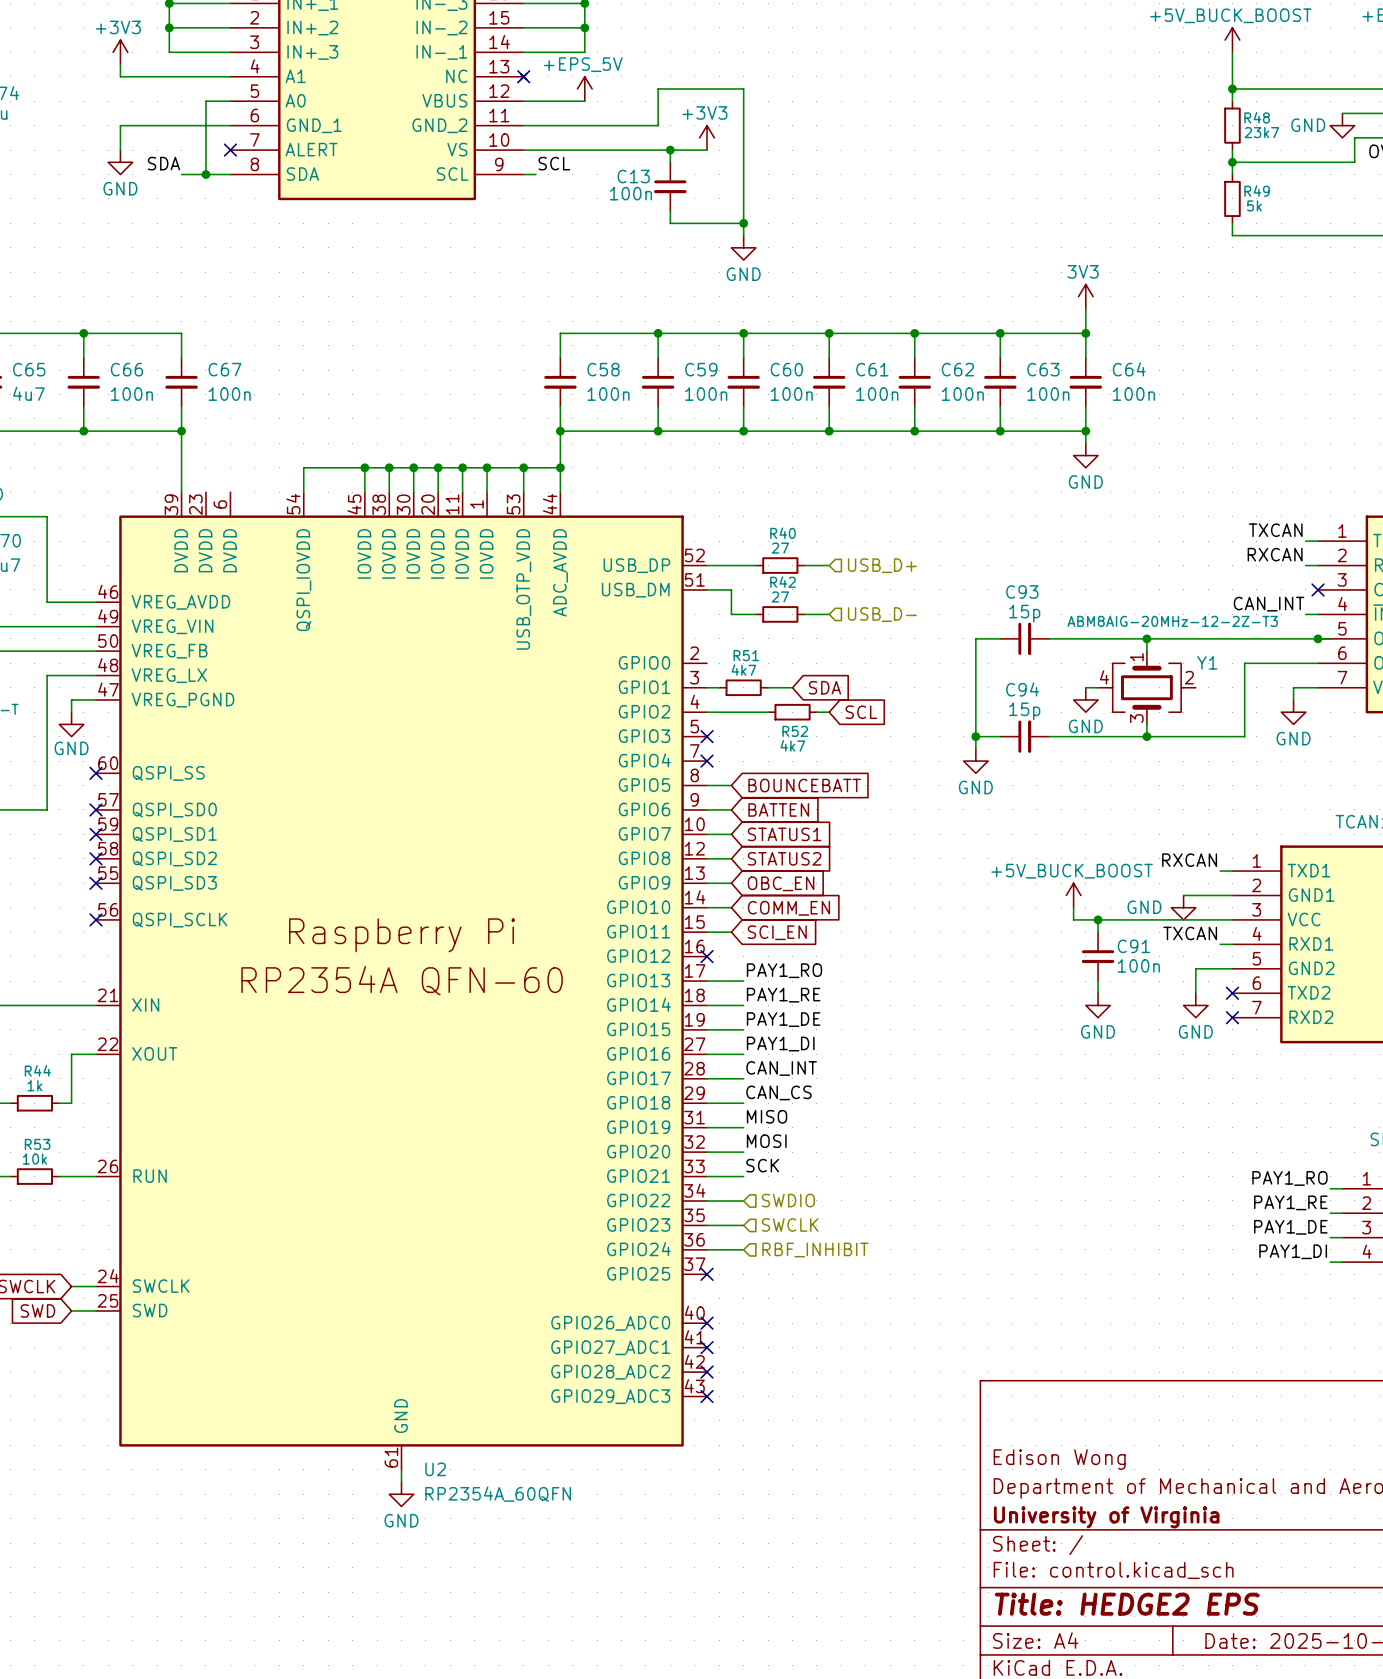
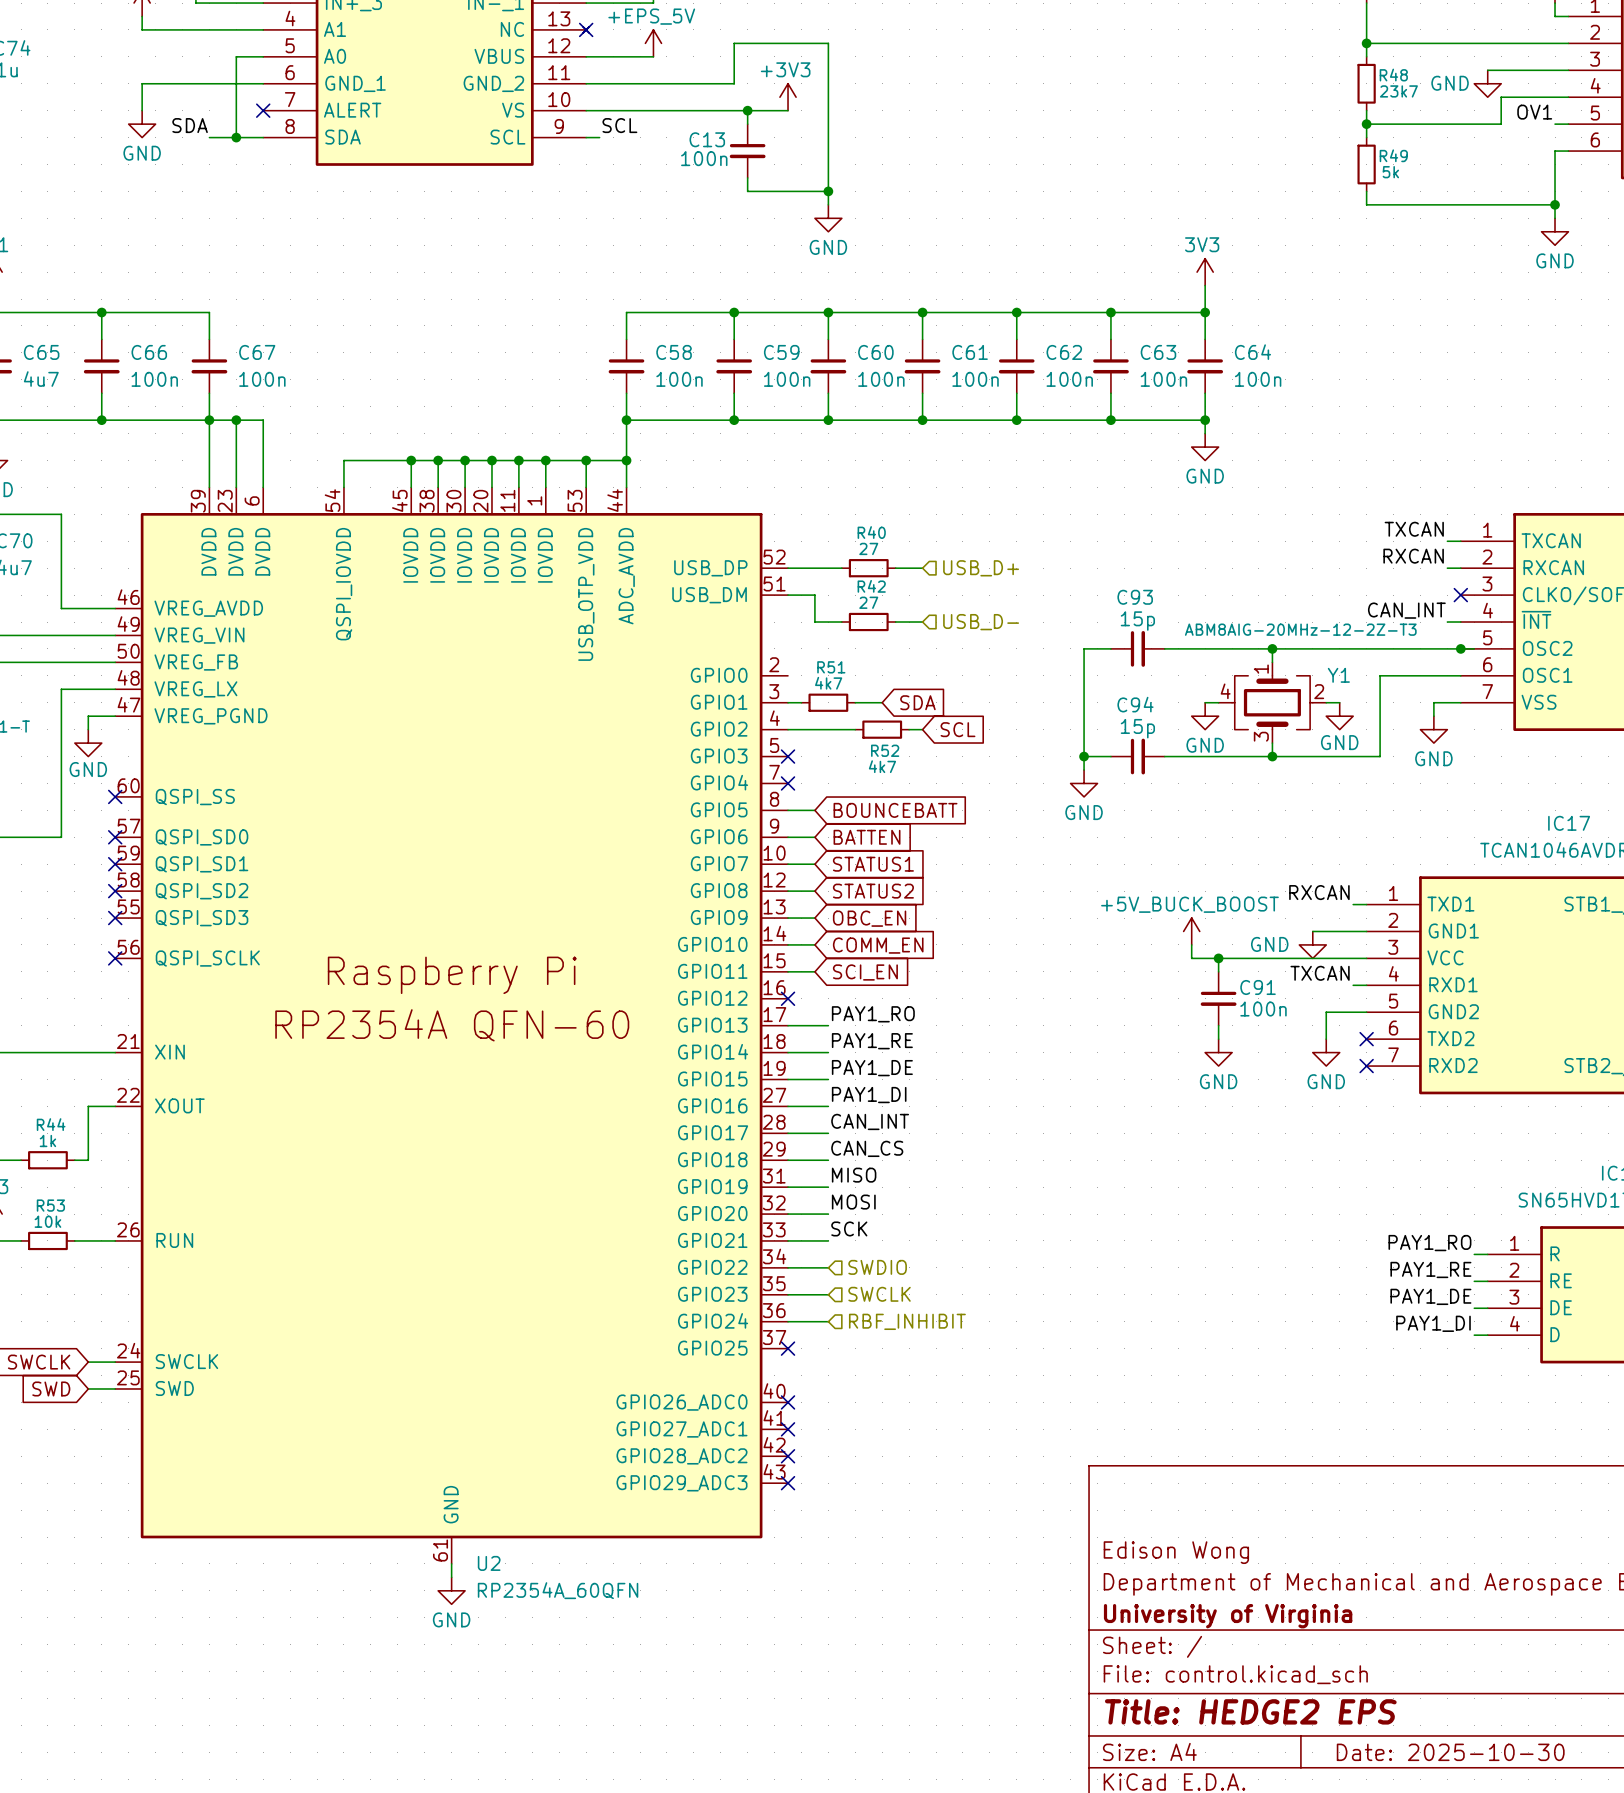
wire: none -> (209, 420) (263, 420) (263, 487)
wire: none -> (236, 420) (236, 487)
junction: none -> (236, 420)
wire: none -> (1326, 702) (1339, 702)
power symbol: none -> GND (1339, 716)

